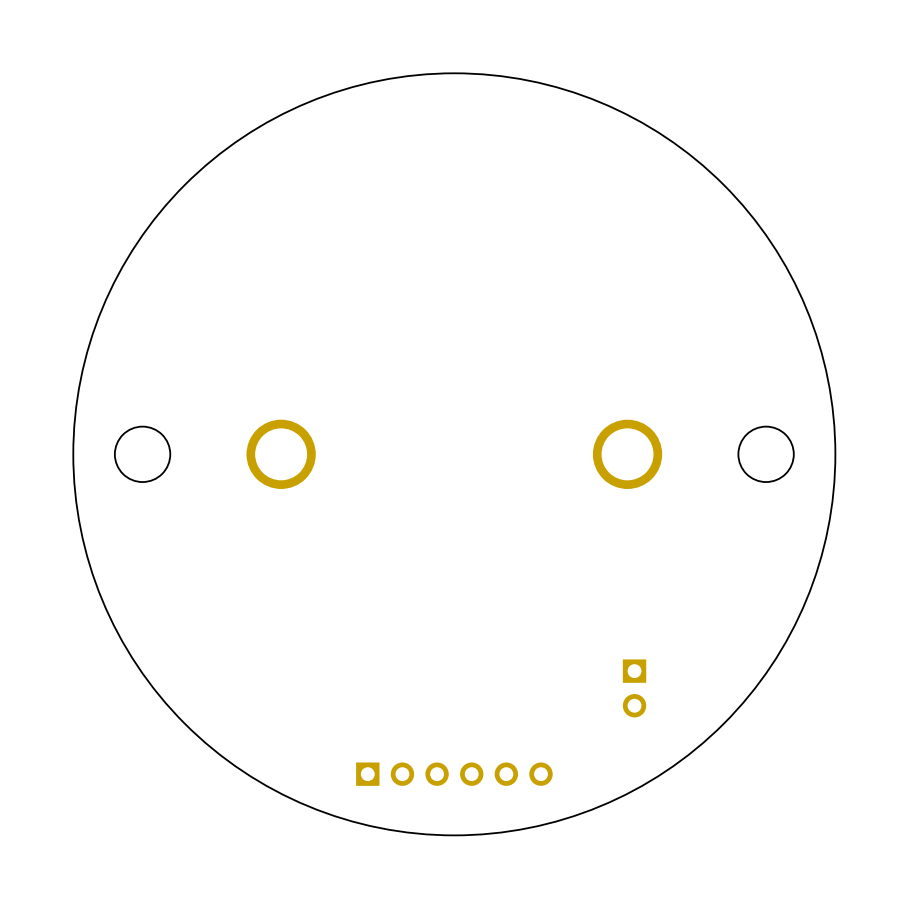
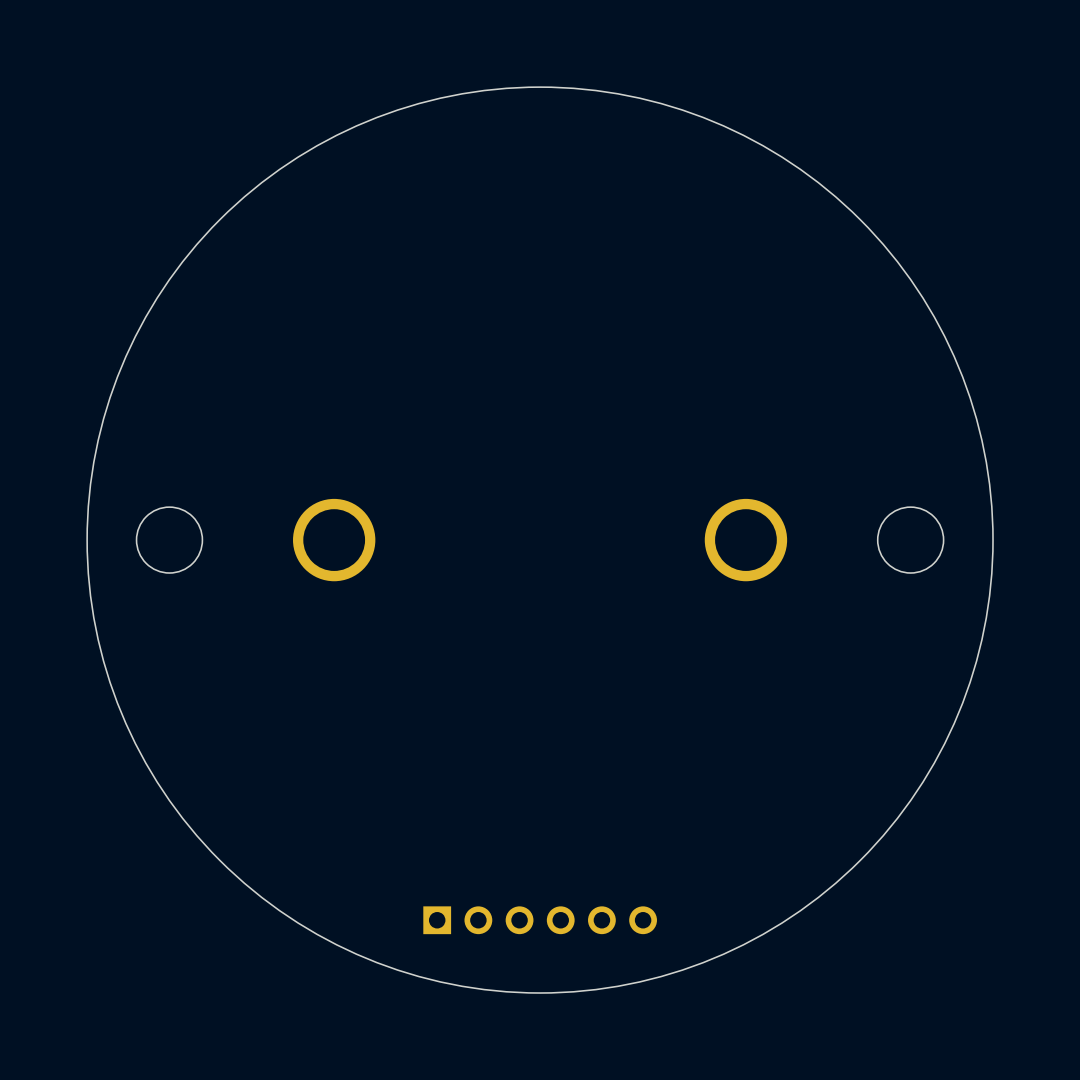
part: (634, 688) -> none

